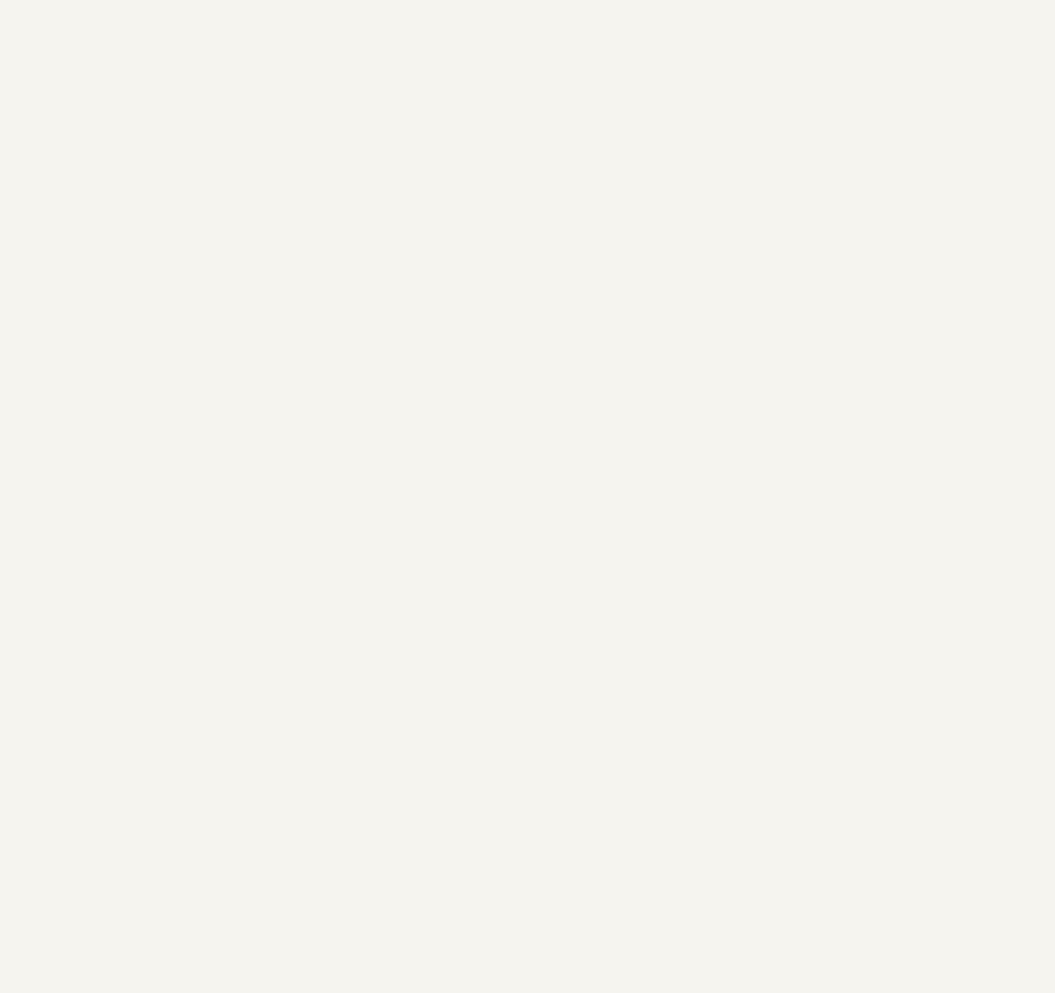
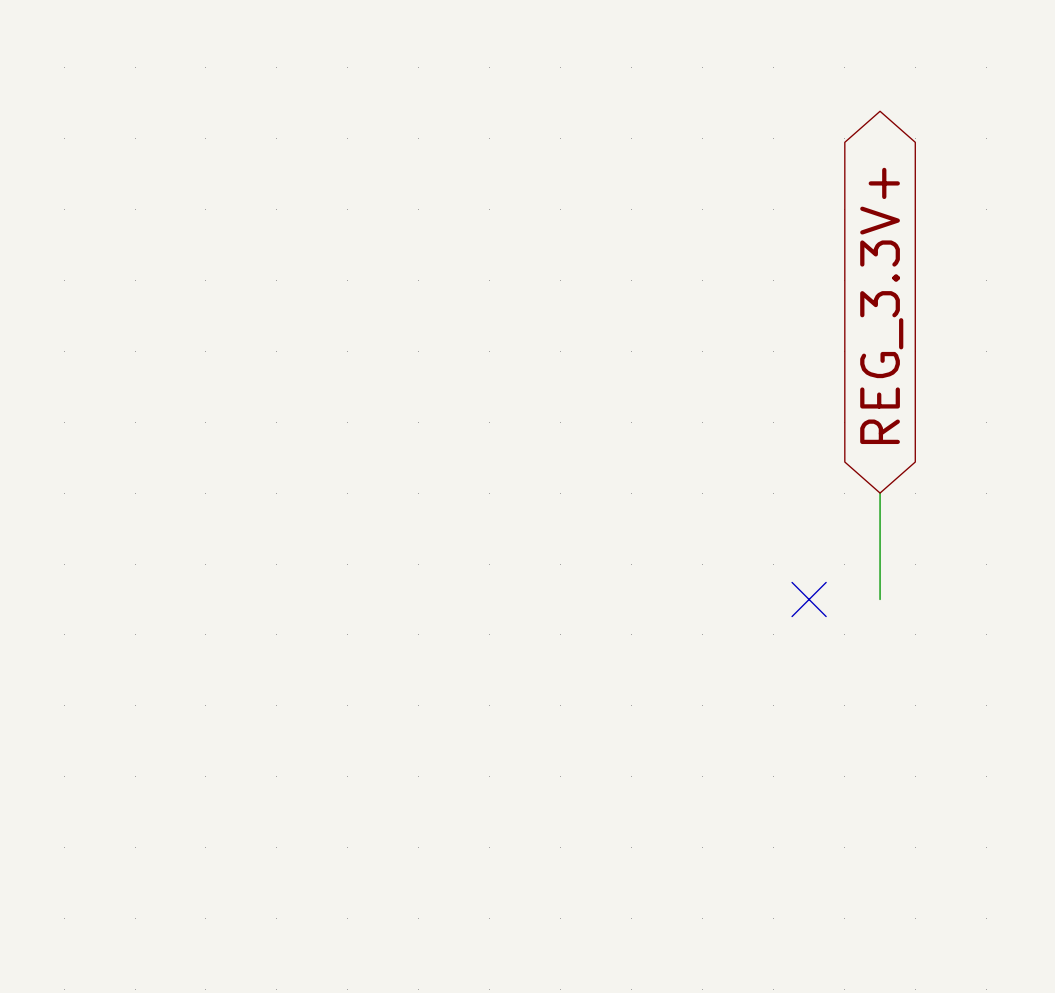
global label: none -> REG_3.3V+ (881, 305)
wire: none -> (880, 493) (880, 599)
no-connect mark: none -> (809, 599)

